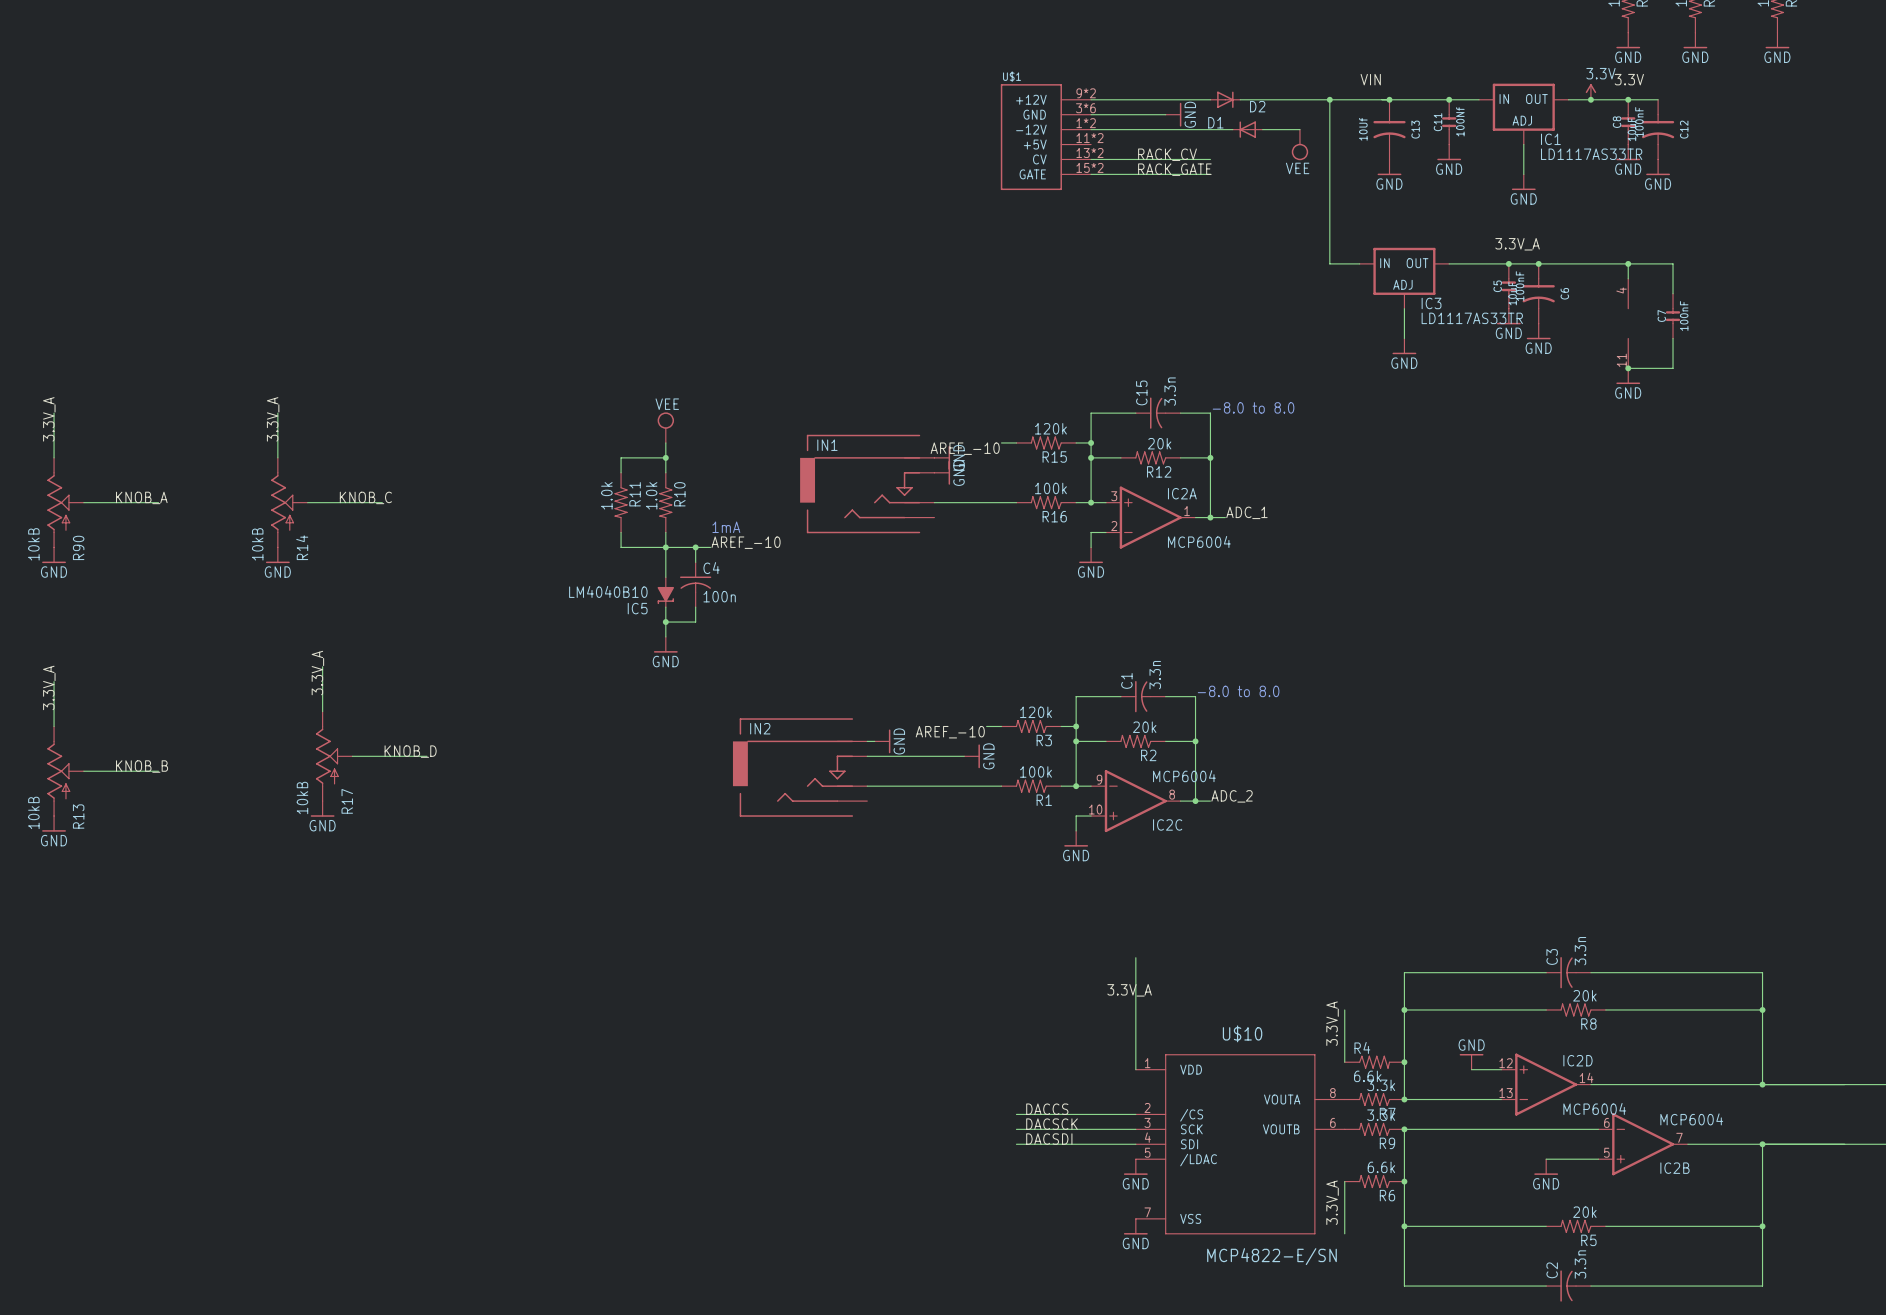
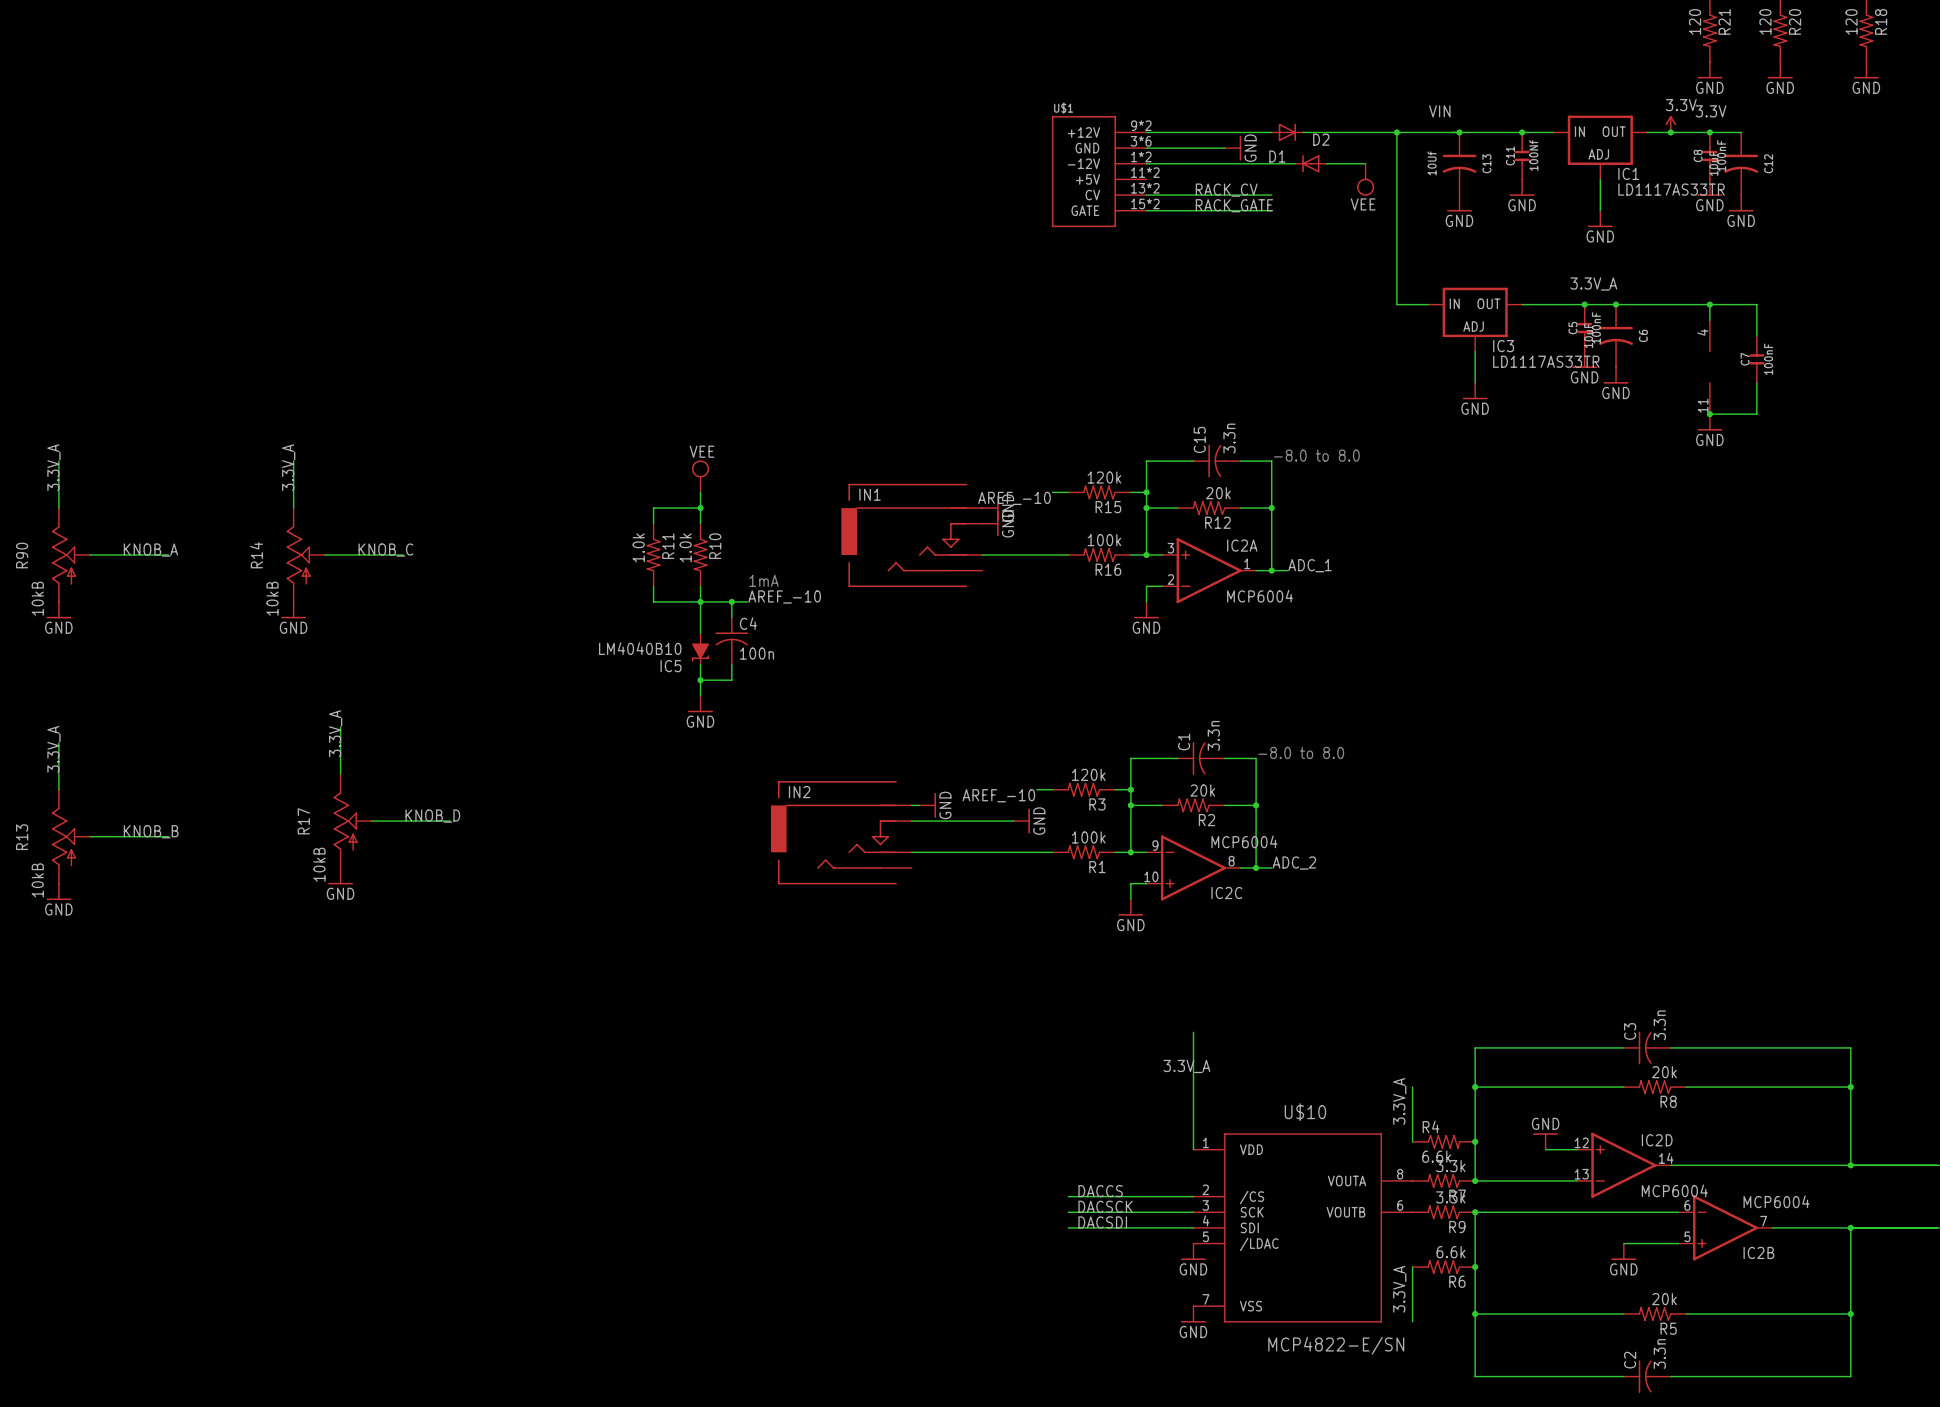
R90 name position: R90 (78, 547) -> R90 (22, 555)
R14 name position: R14 (302, 547) -> R14 (256, 555)
R17 name position: R17 (347, 801) -> R17 (303, 821)
R13 name position: R13 (78, 816) -> R13 (22, 837)

